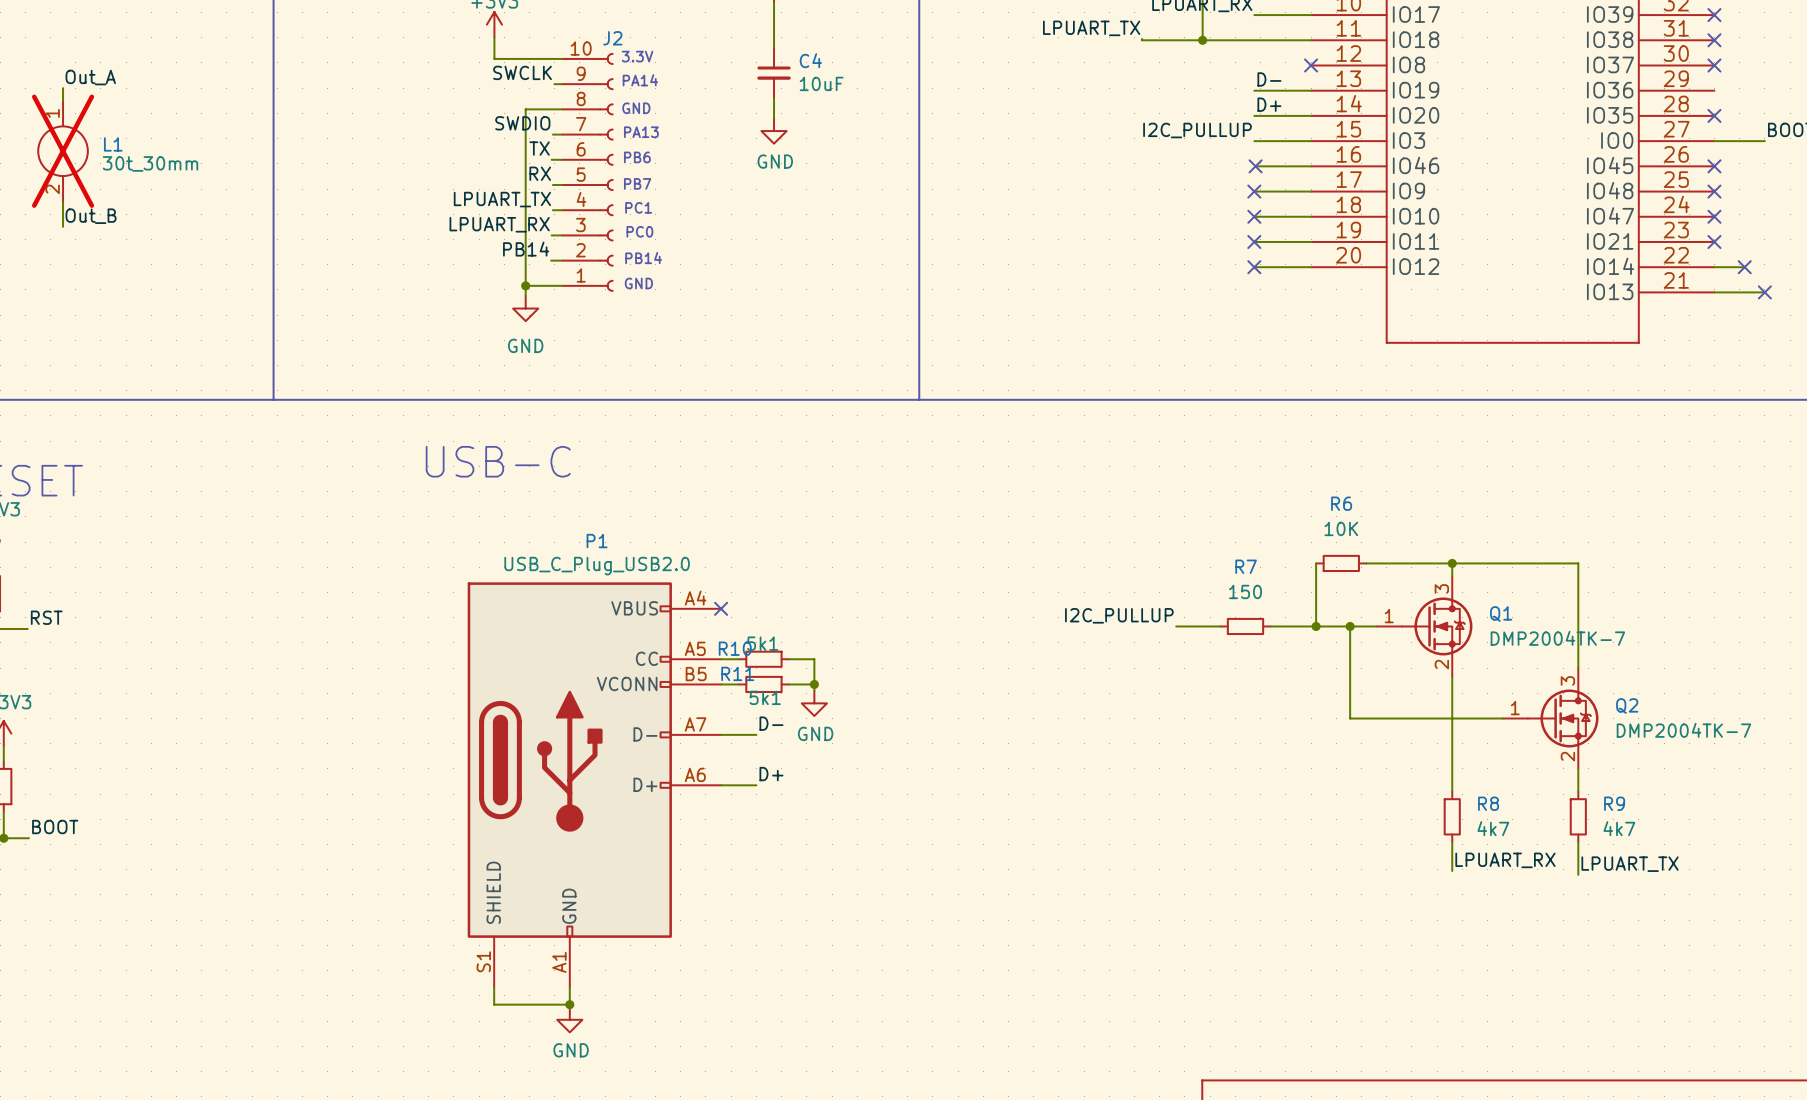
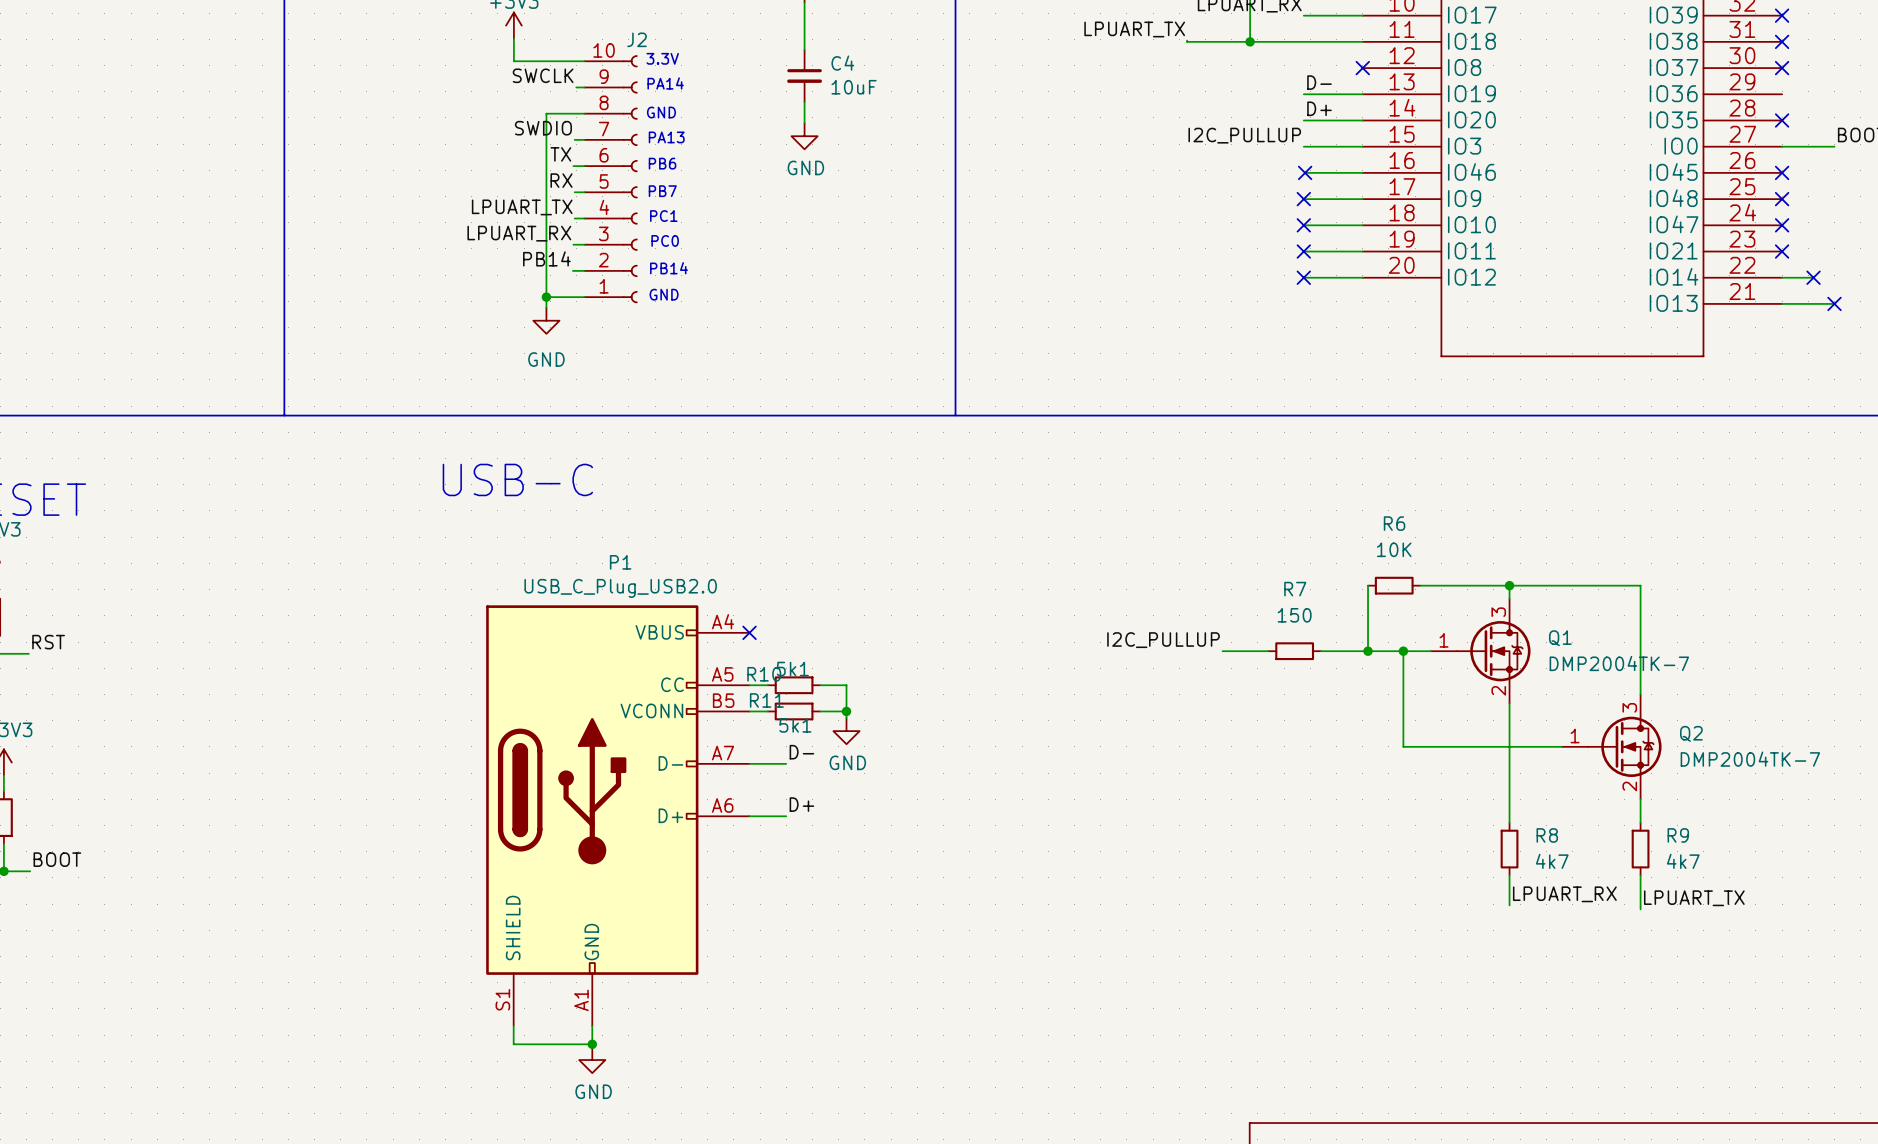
label: Out_A (90, 77) -> none
wire: (63, 88) (63, 100) -> none
L1: 30t_30mm (63, 151) -> none
wire: (63, 201) (63, 226) -> none
label: Out_B (91, 216) -> none

